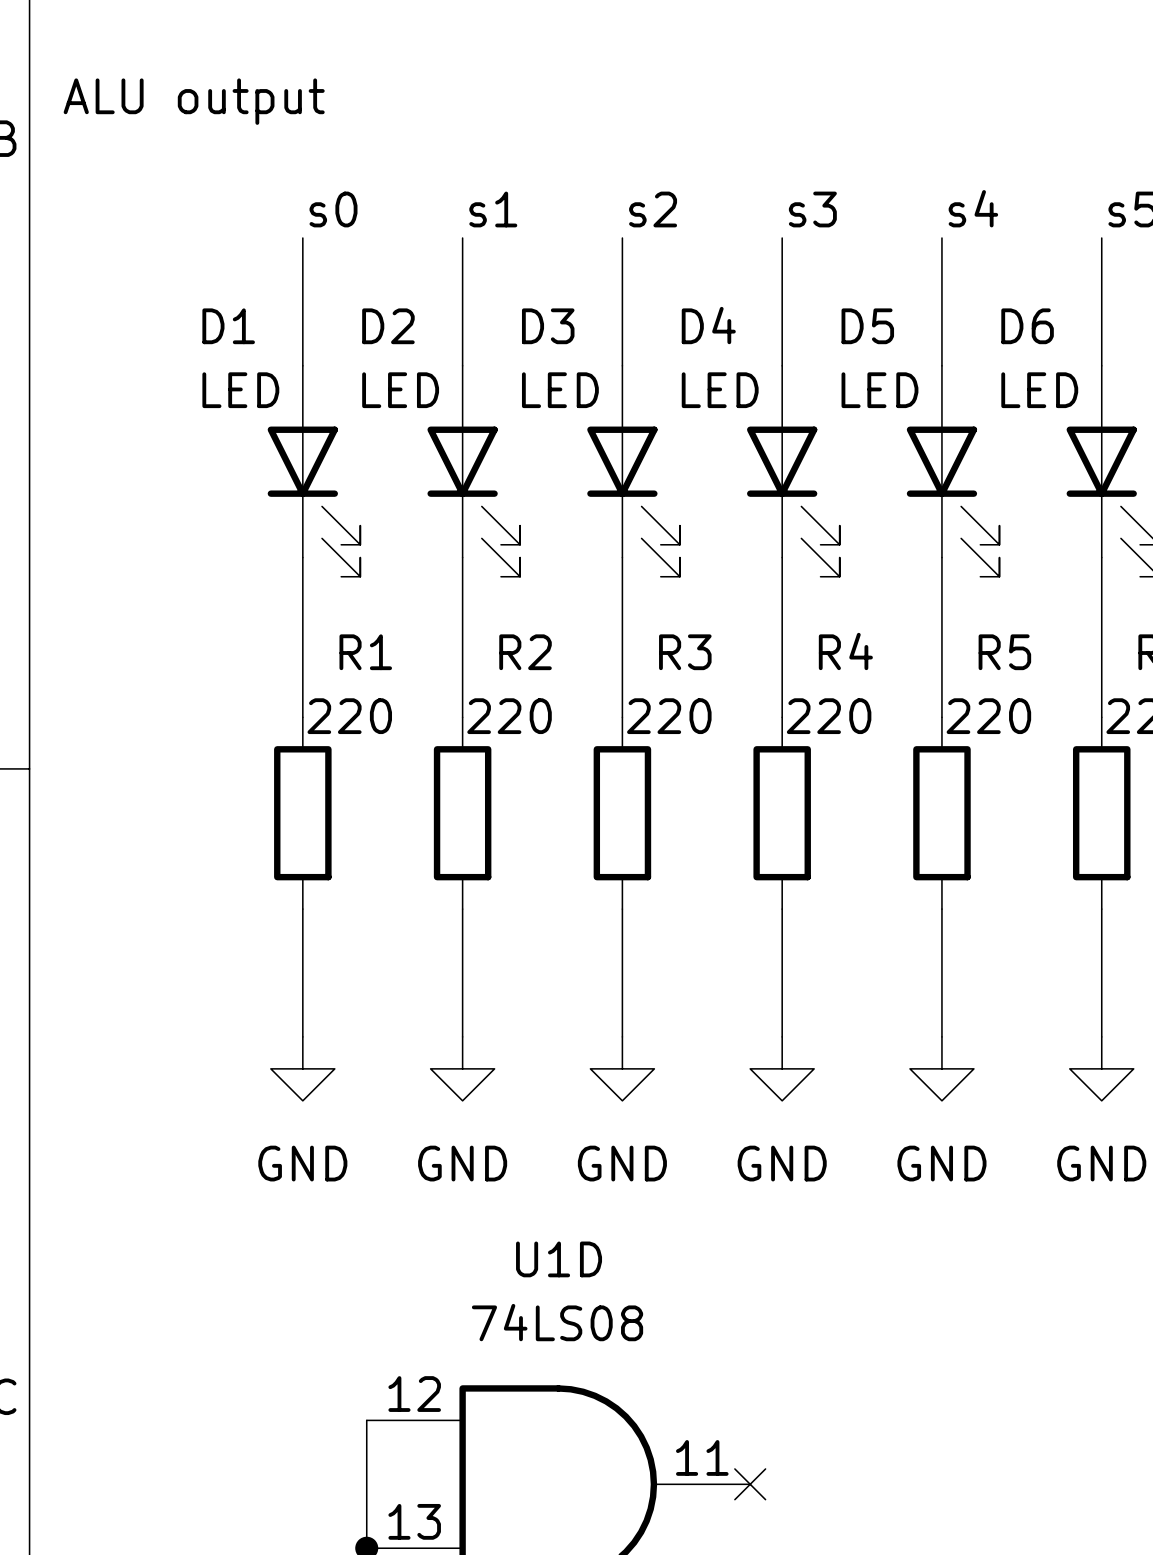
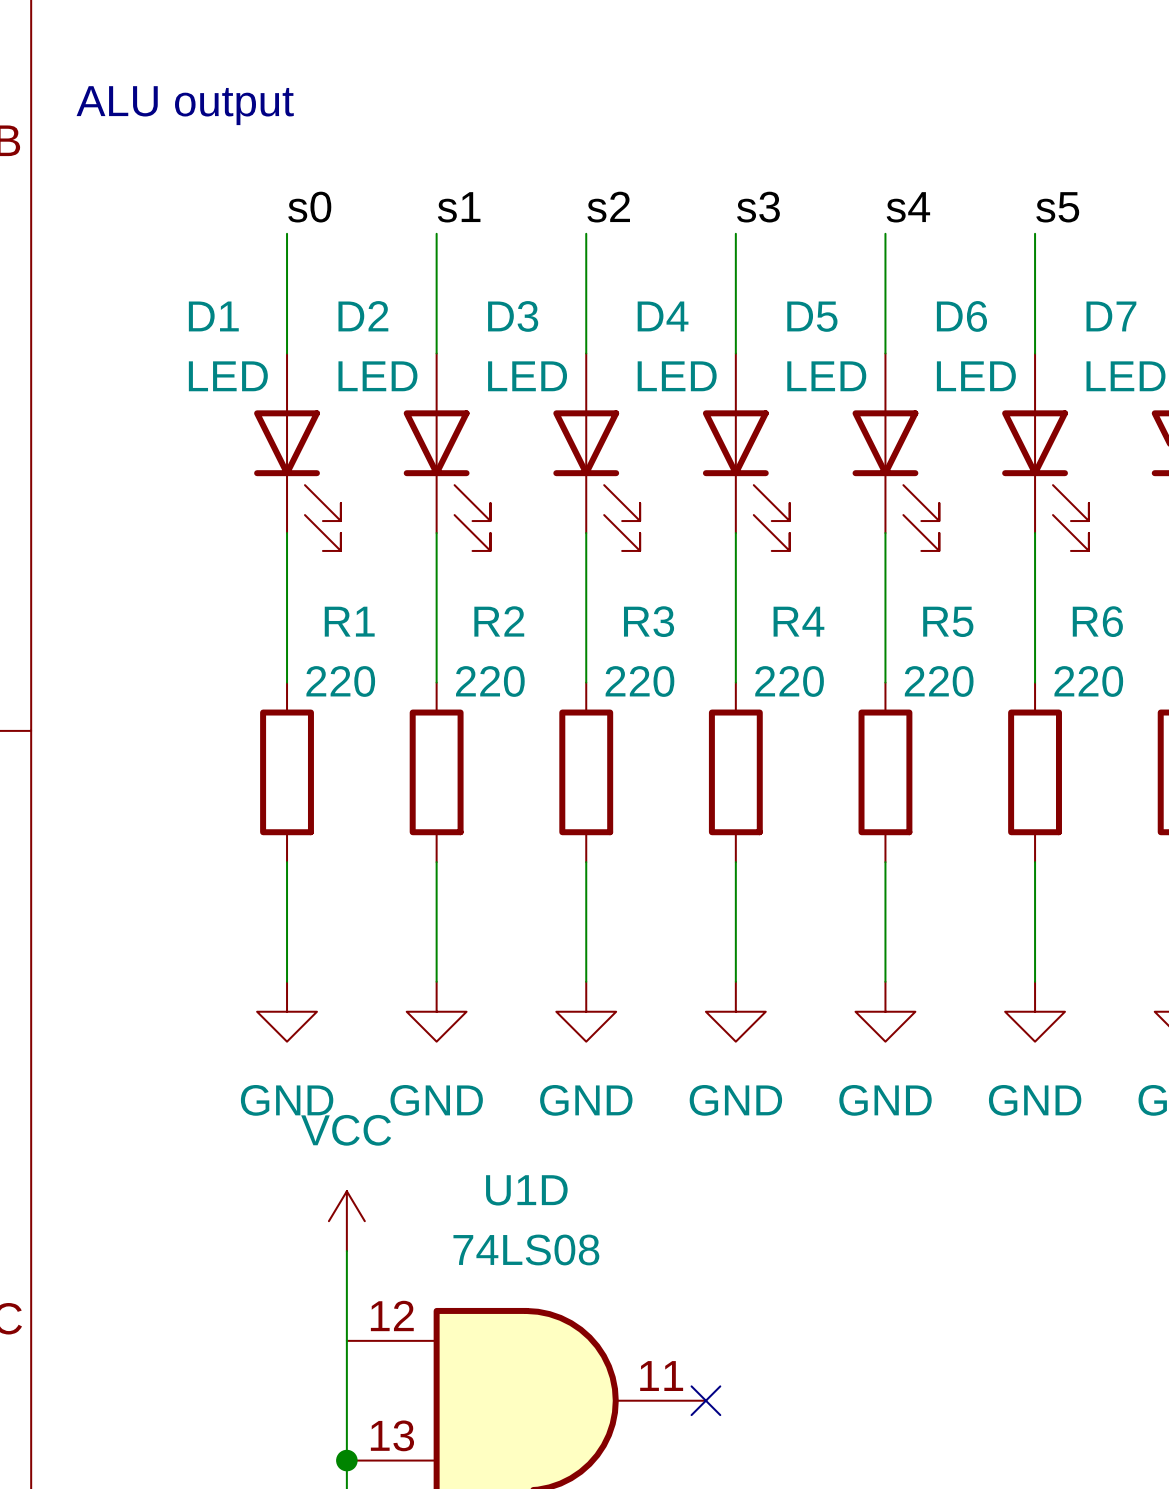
power symbol: none -> VCC (346, 1221)
wire: none -> (346, 1251) (346, 1340)

